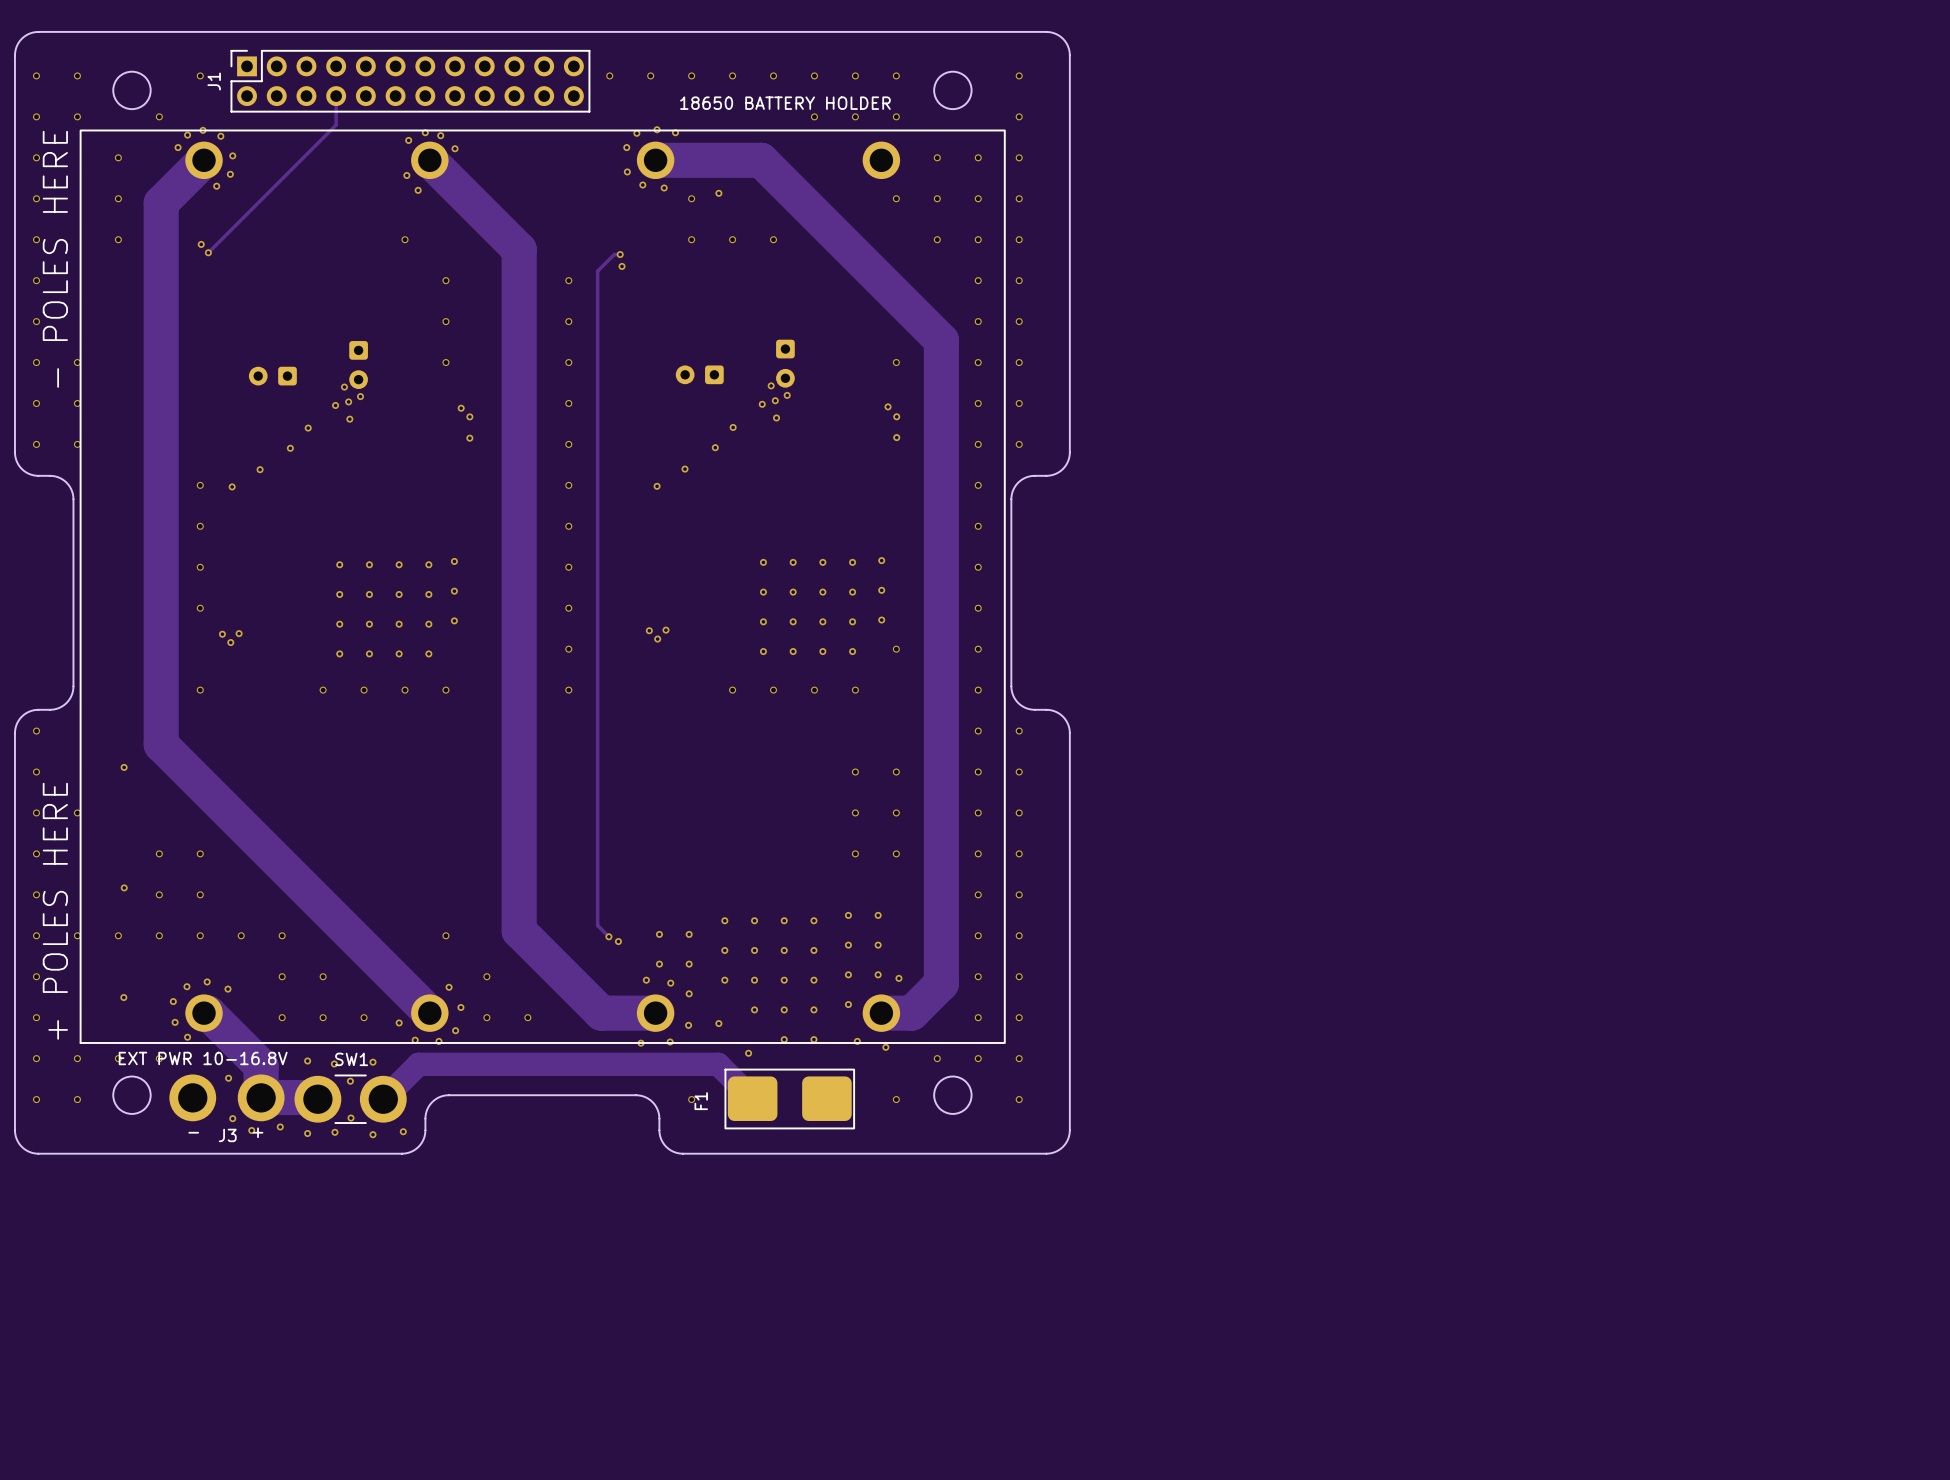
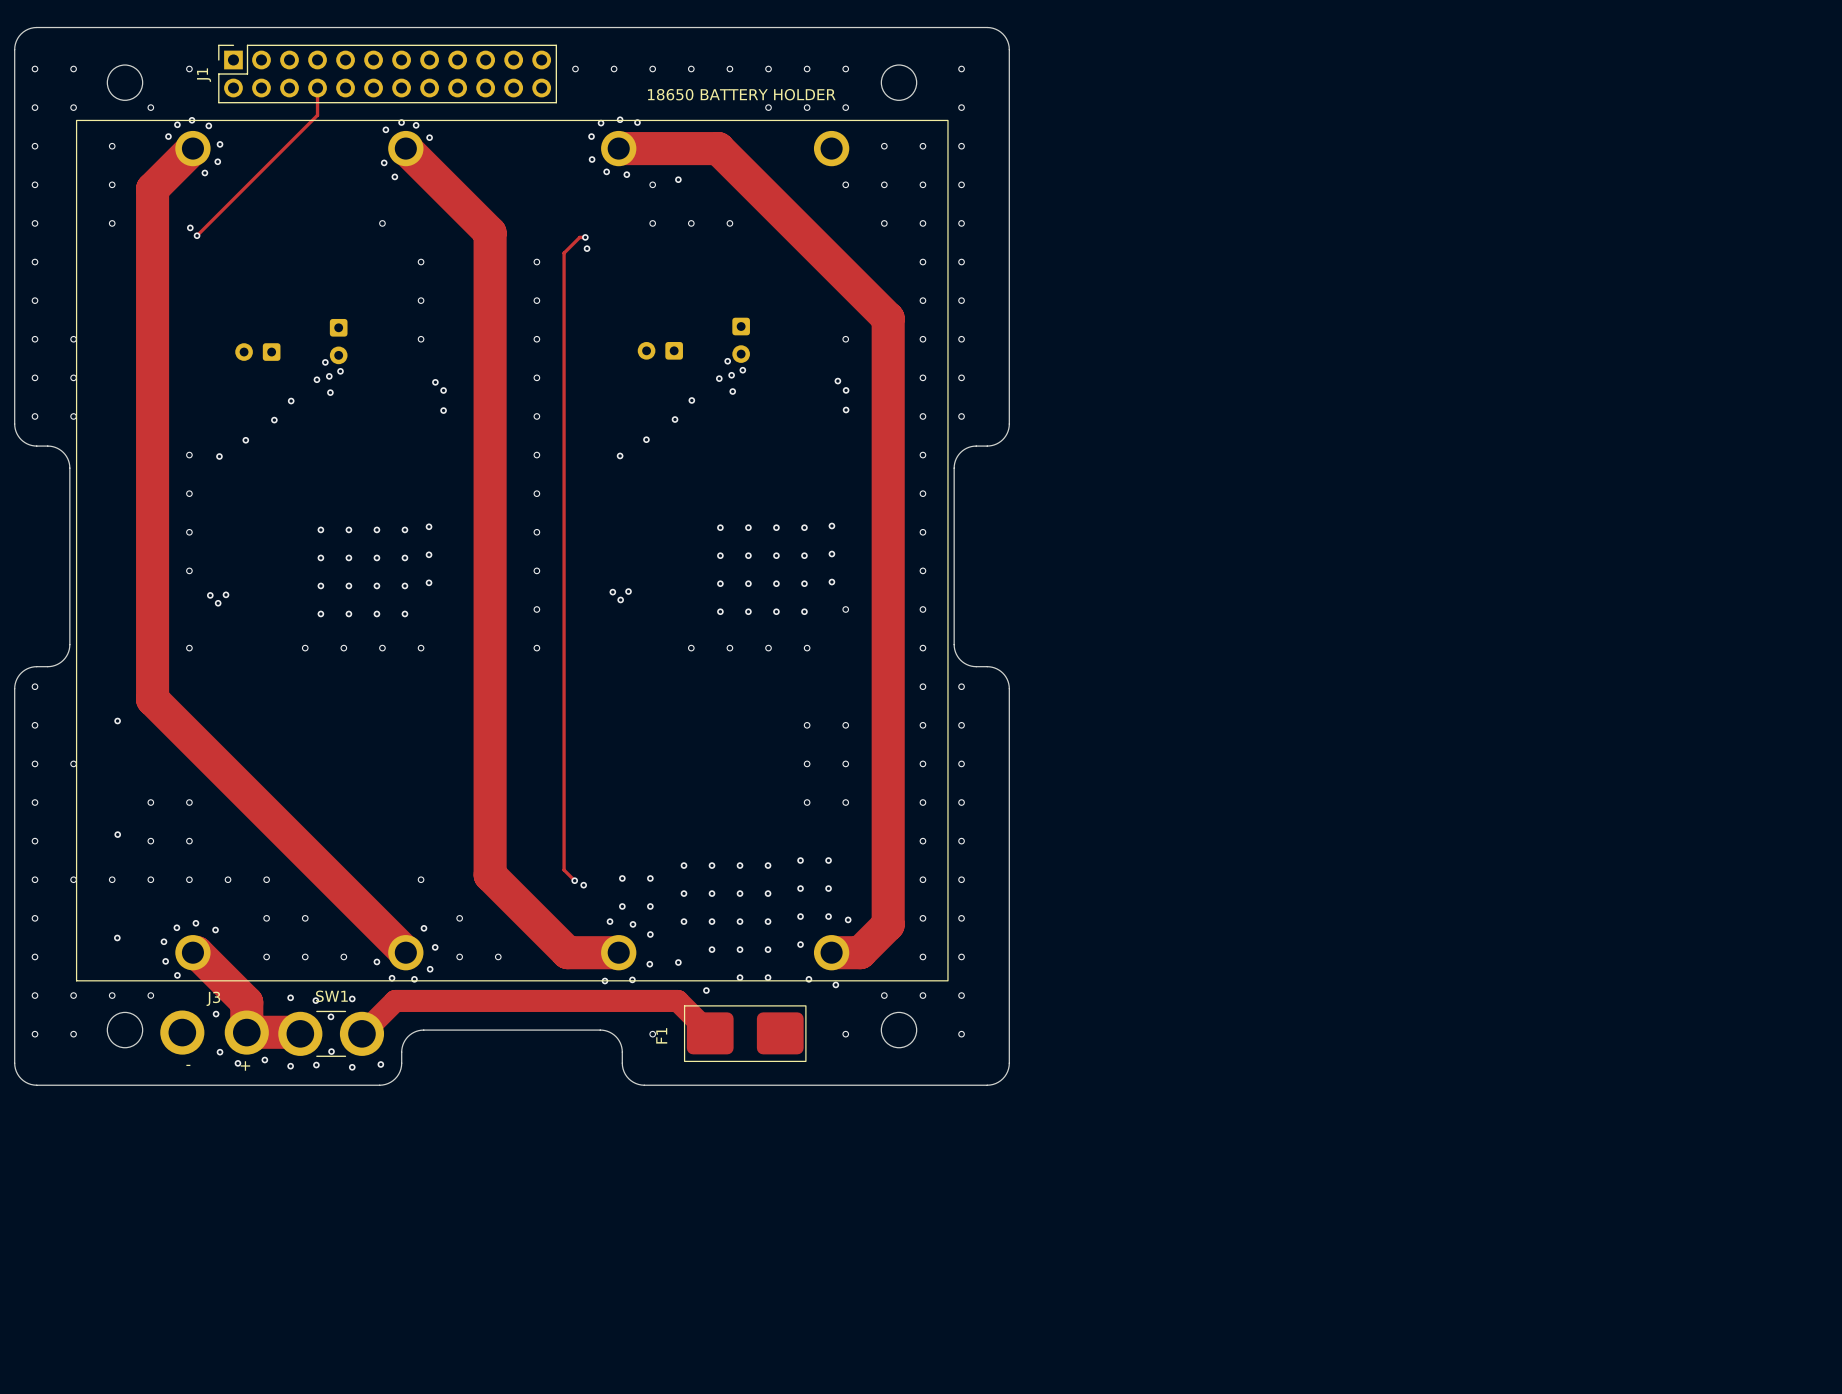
text: - POLES HERE (55, 259) -> none
text: + POLES HERE (55, 911) -> none
text: EXT PWR 10-16.8V (203, 1058) -> none
J3 name position: J3 (227, 1135) -> J3 (213, 998)

